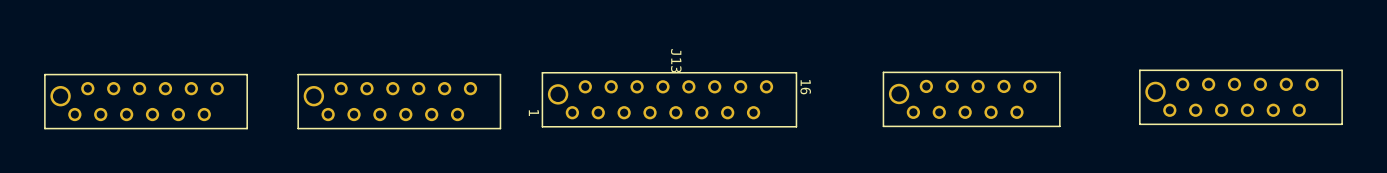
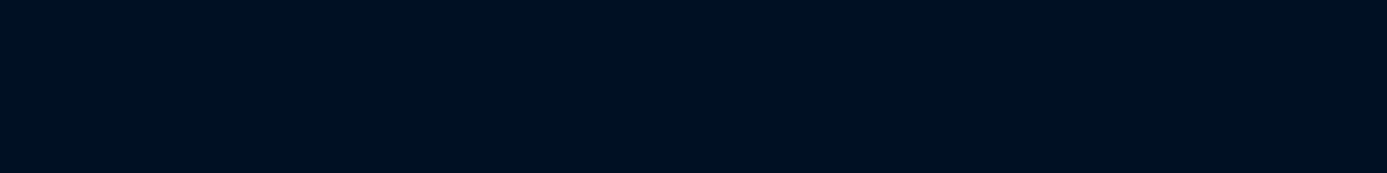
part: (1240, 97) -> none
J13: (669, 99) -> none
part: (971, 99) -> none
part: (146, 101) -> none
part: (399, 101) -> none

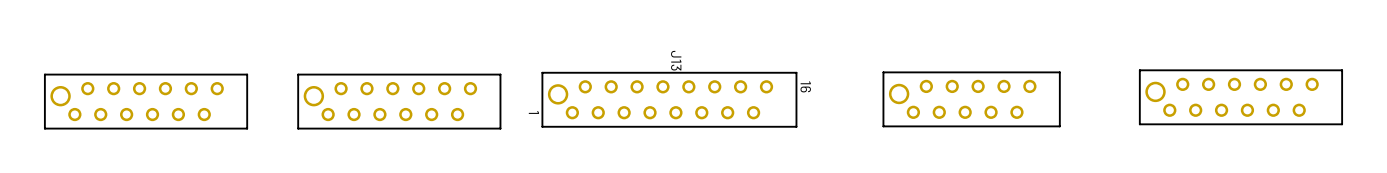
part: none -> (1240, 97)
J13: none -> (669, 99)
part: none -> (971, 99)
part: none -> (146, 101)
part: none -> (399, 101)

